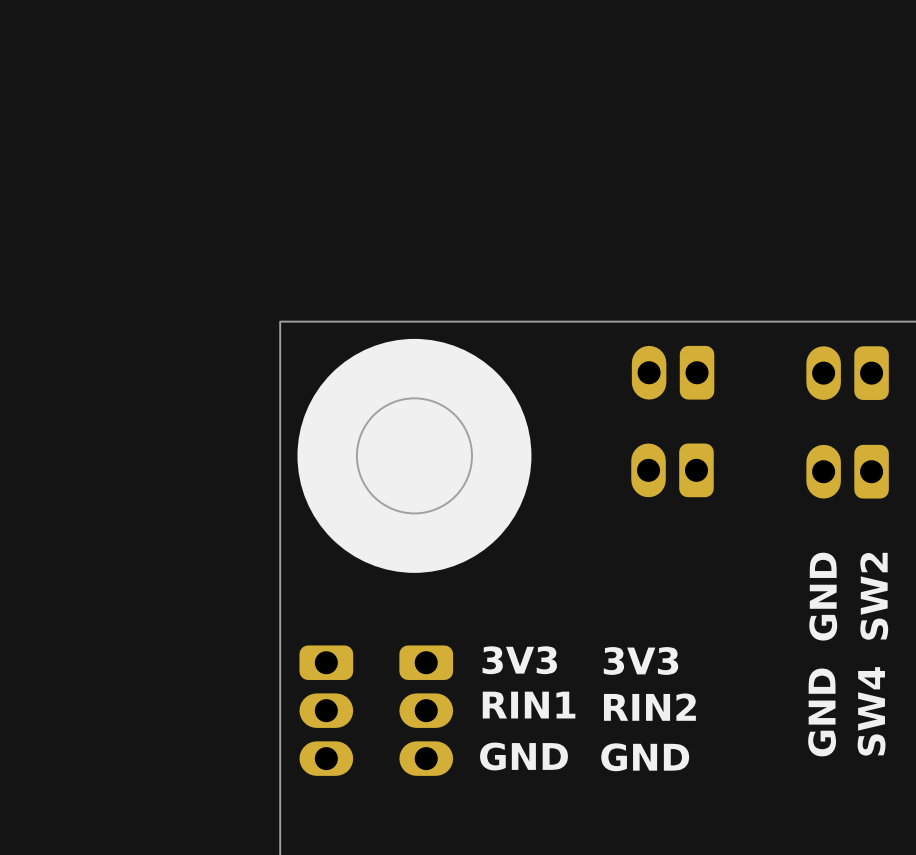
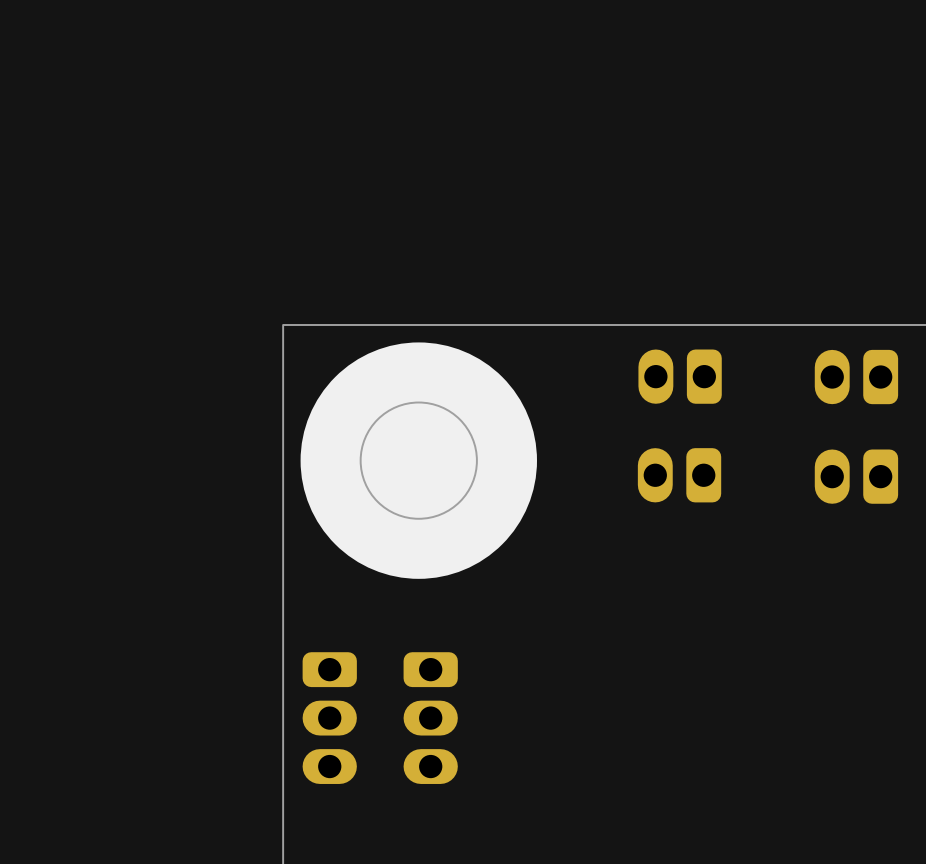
text: GND (823, 596) -> none
text: SW2 (874, 596) -> none
text: 3V3 (519, 660) -> none
text: 3V3 (640, 660) -> none
text: RIN1 (529, 705) -> none
text: RIN2 (649, 707) -> none
text: SW4 (871, 711) -> none
text: GND (822, 712) -> none
text: GND (523, 756) -> none
text: GND (645, 757) -> none

